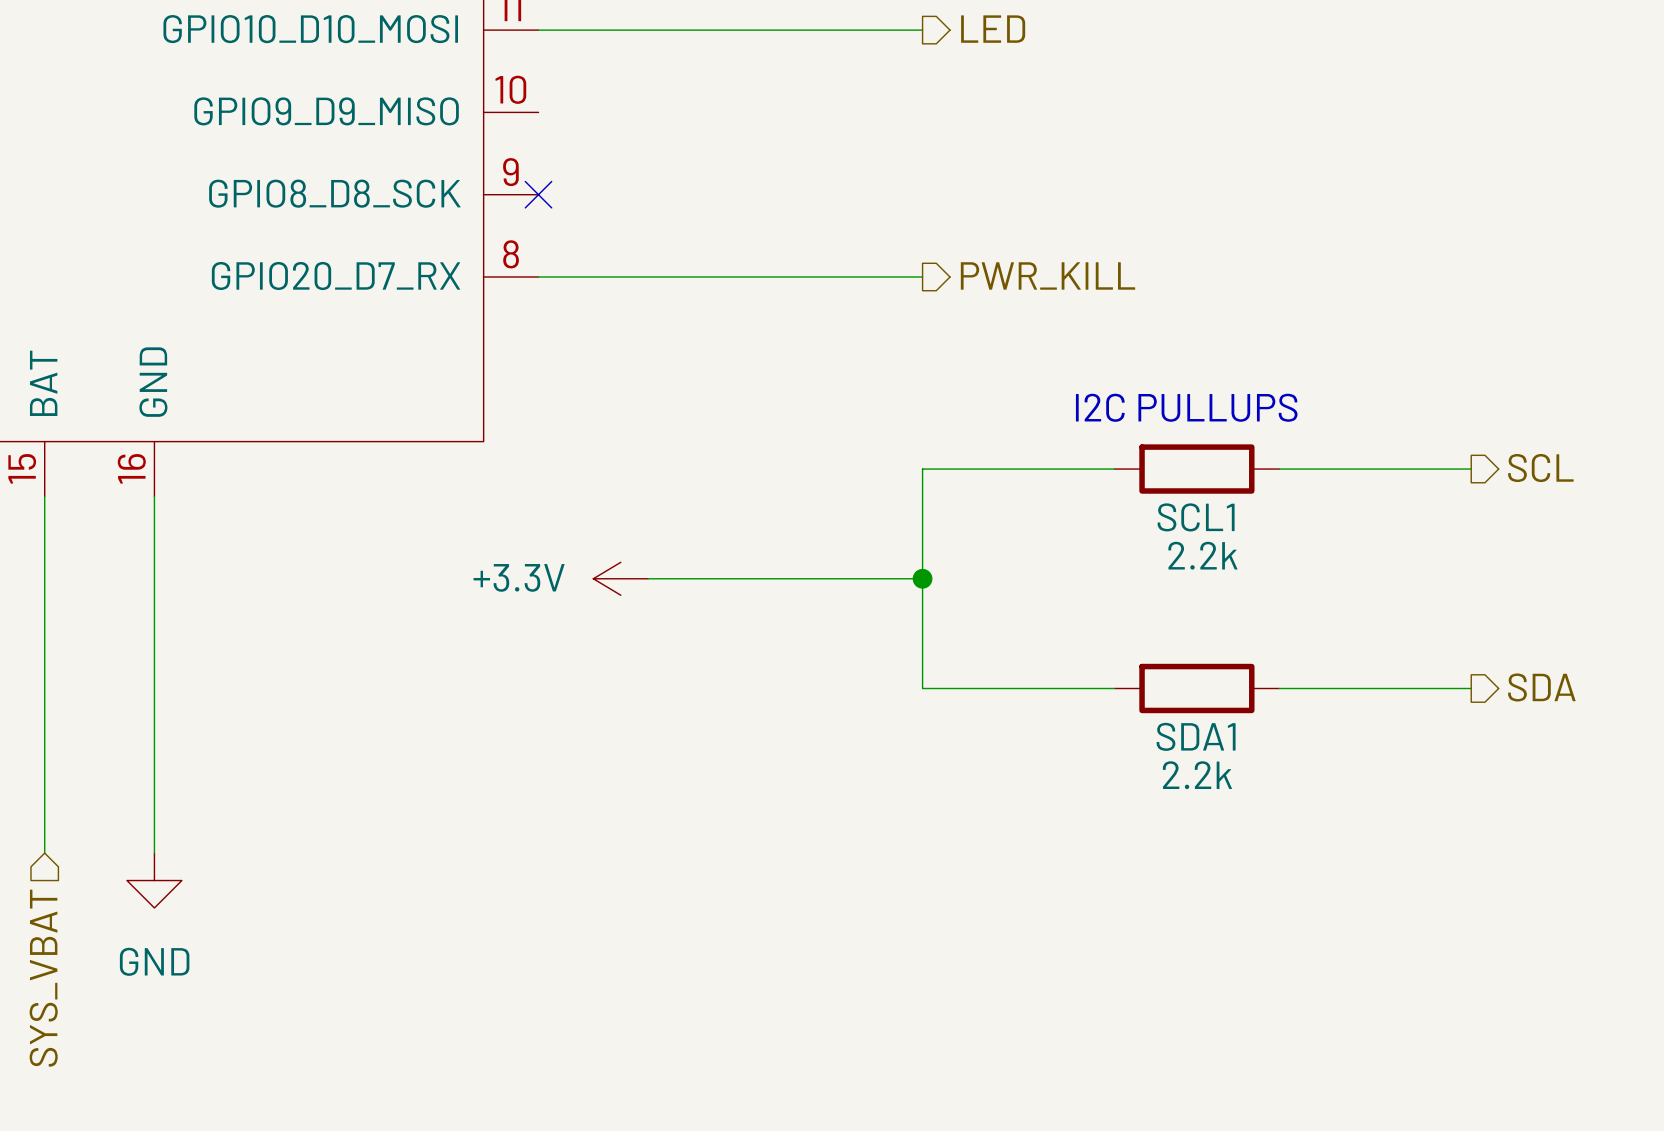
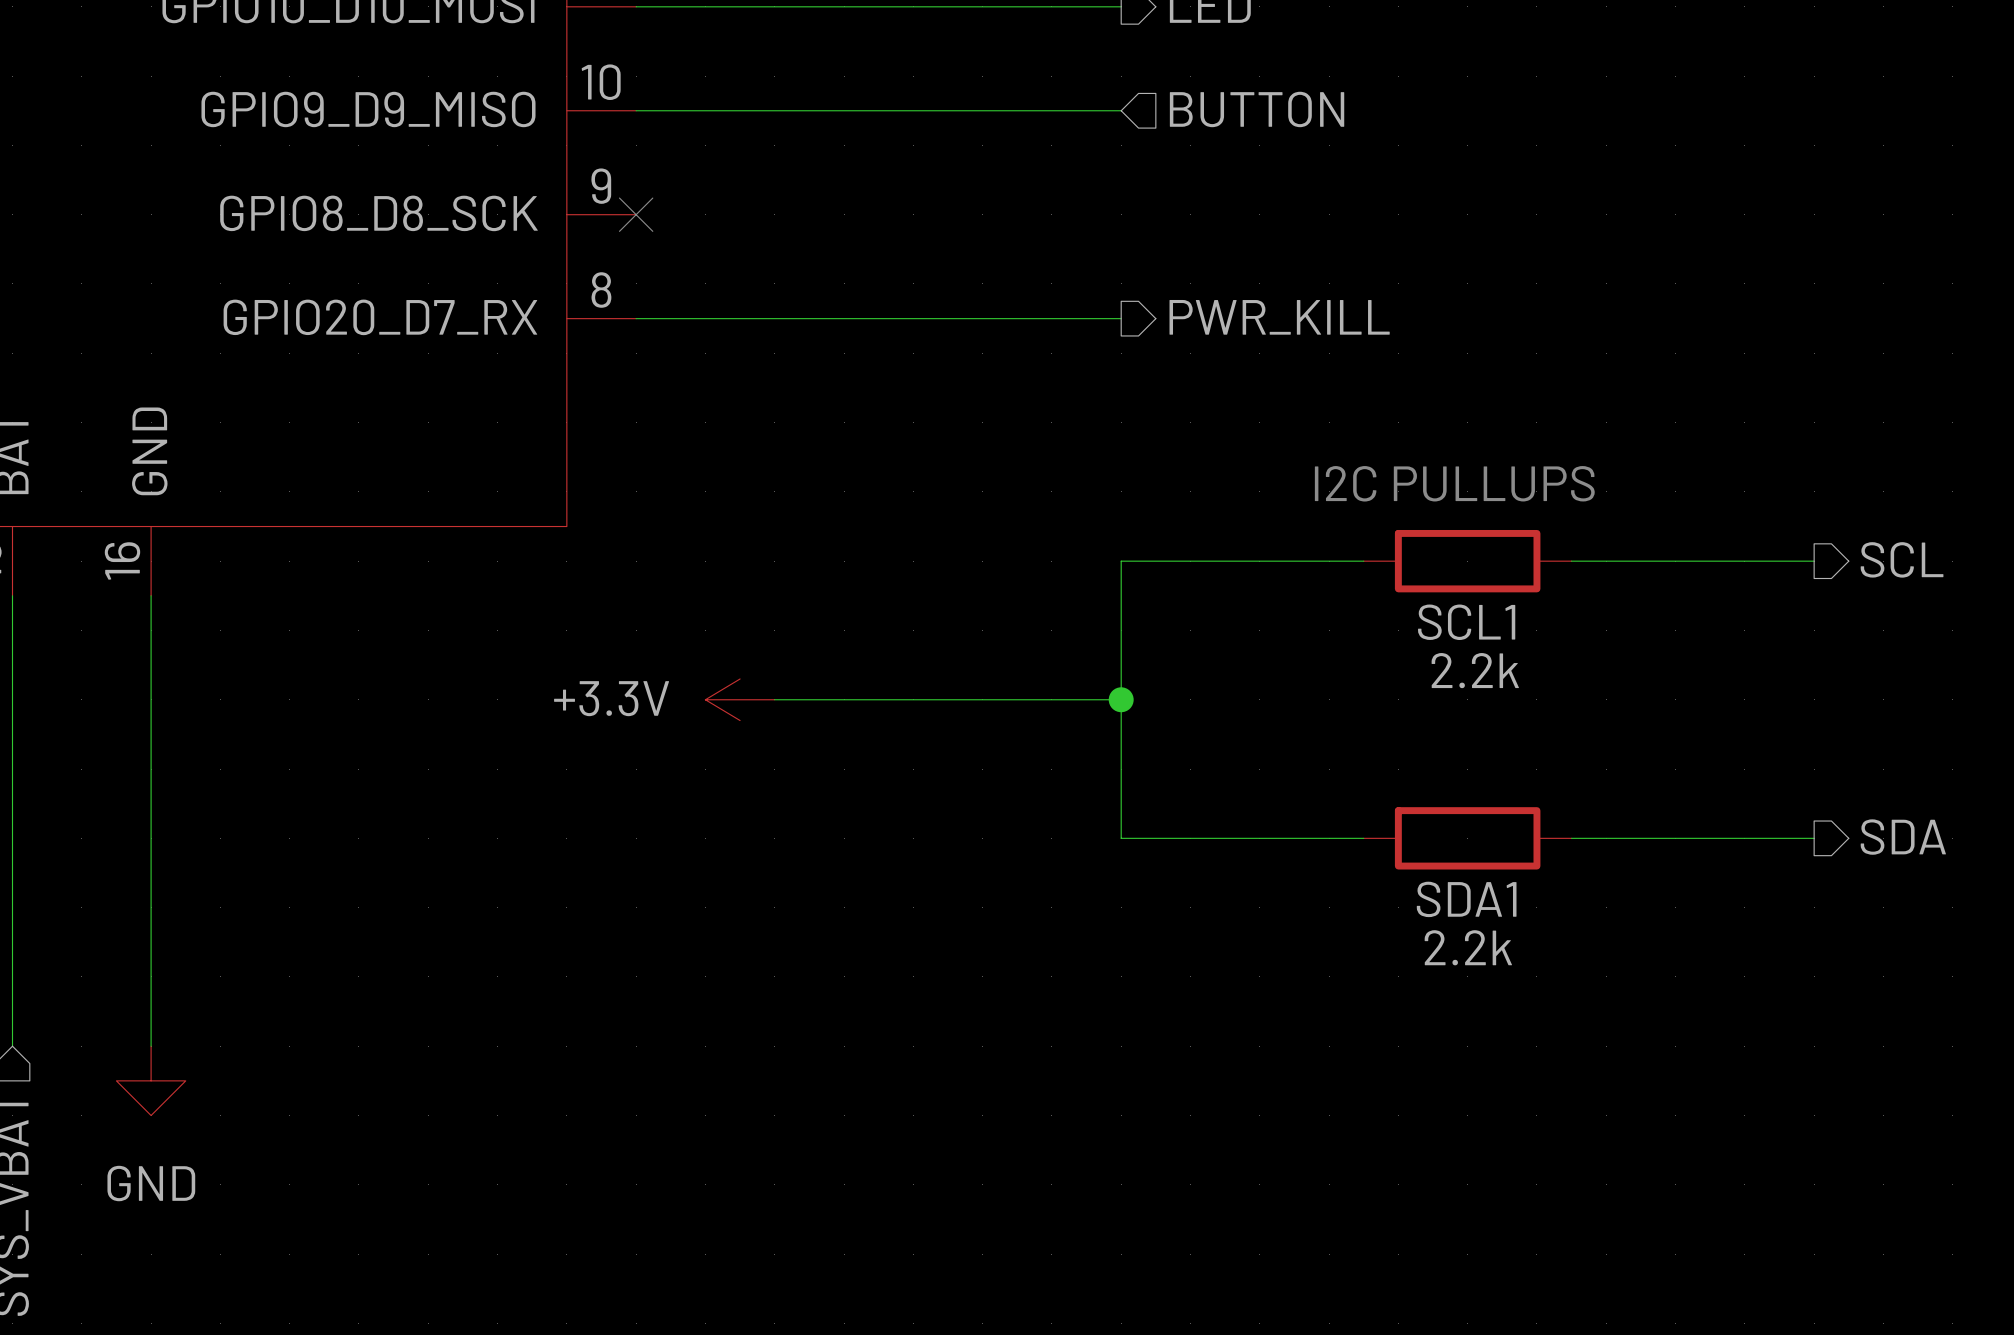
hierarchical label: none -> BUTTON (1257, 109)
wire: none -> (636, 110) (1121, 110)

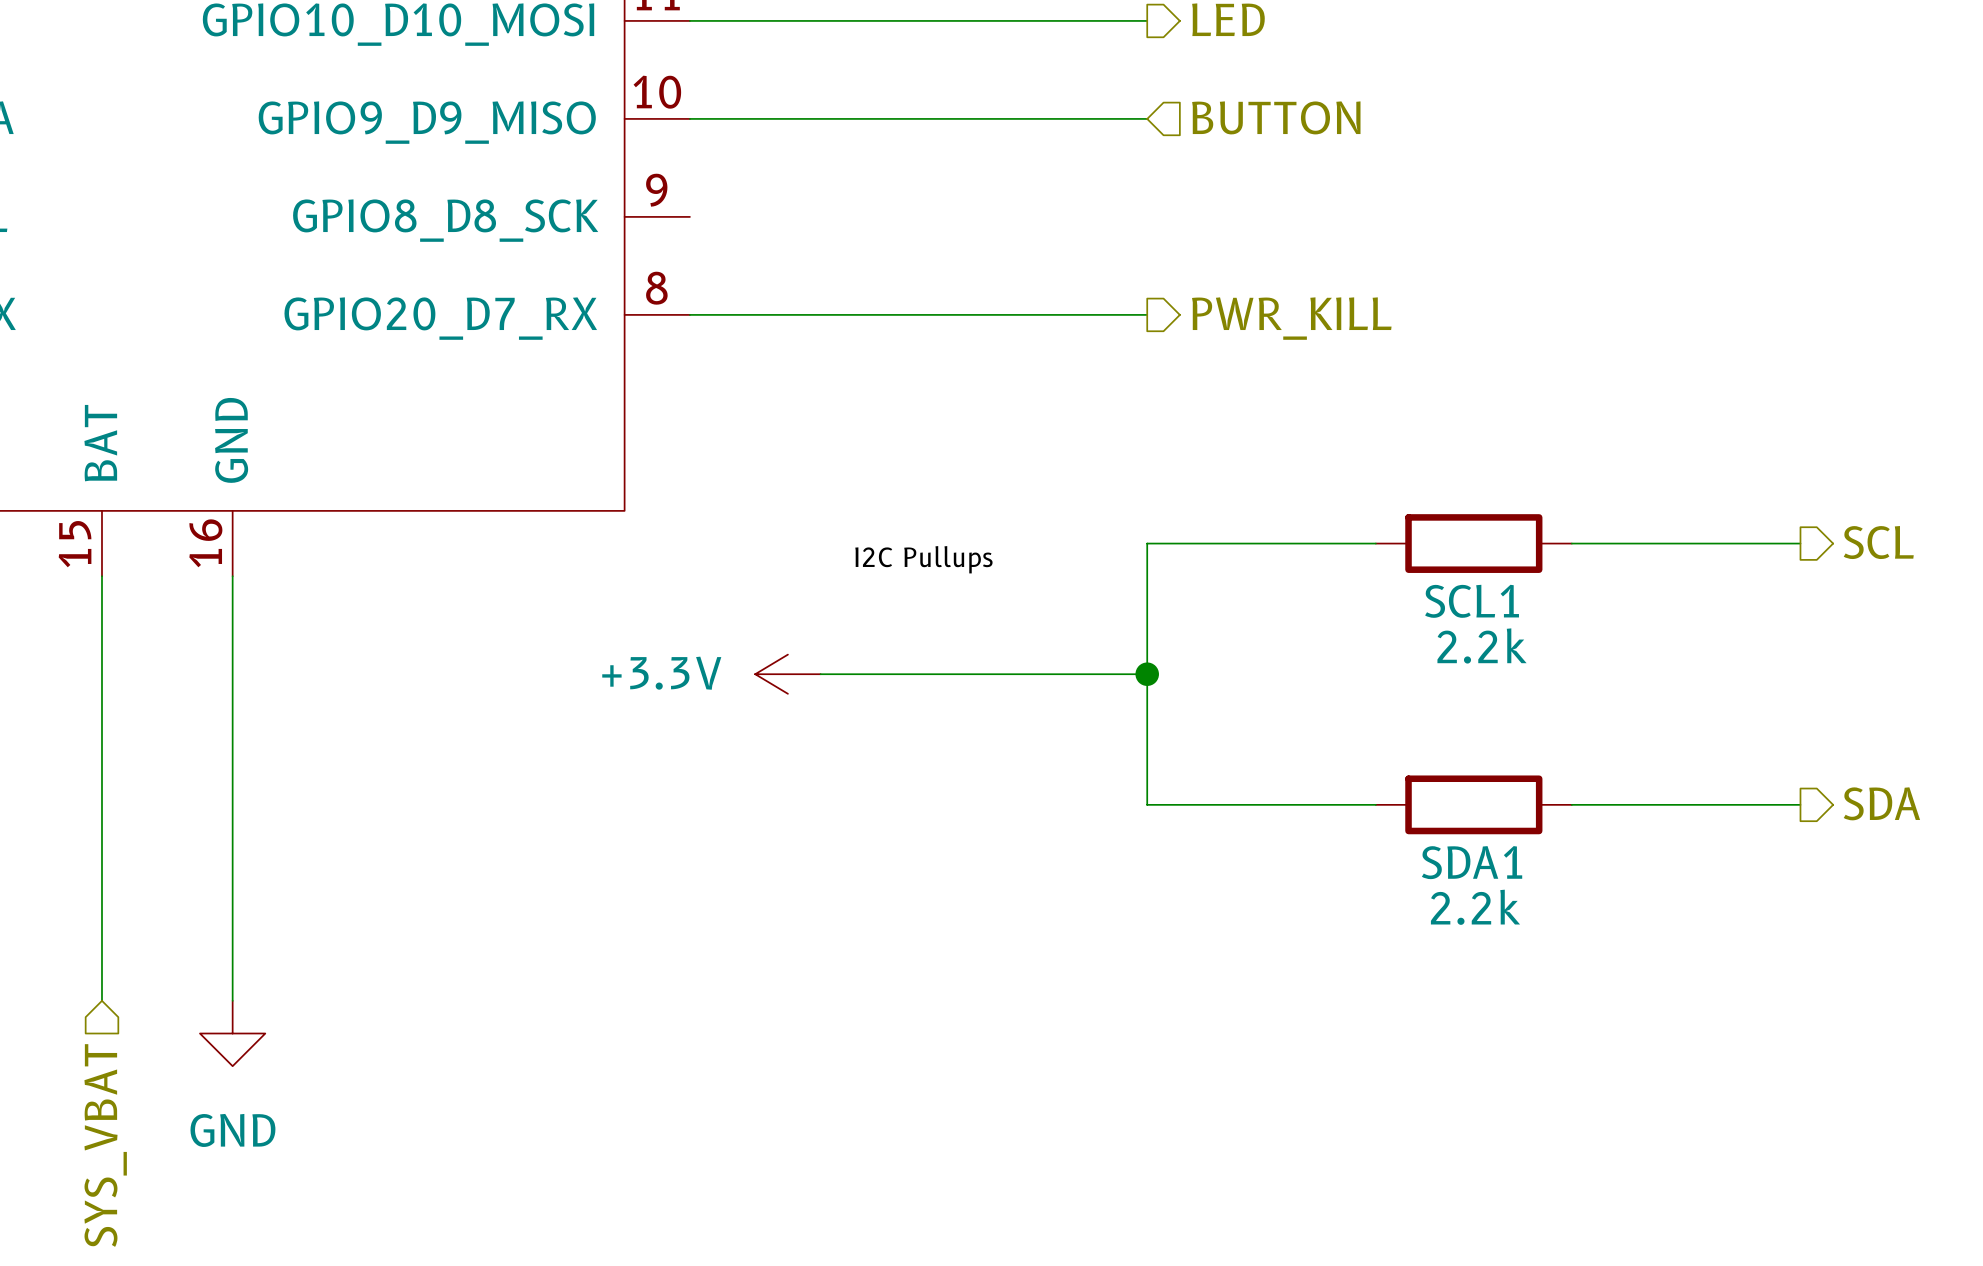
no-connect mark: (636, 214) -> none
text: I2C PULLUPS (1454, 483) -> none
label: none -> I2C Pullups (923, 559)

